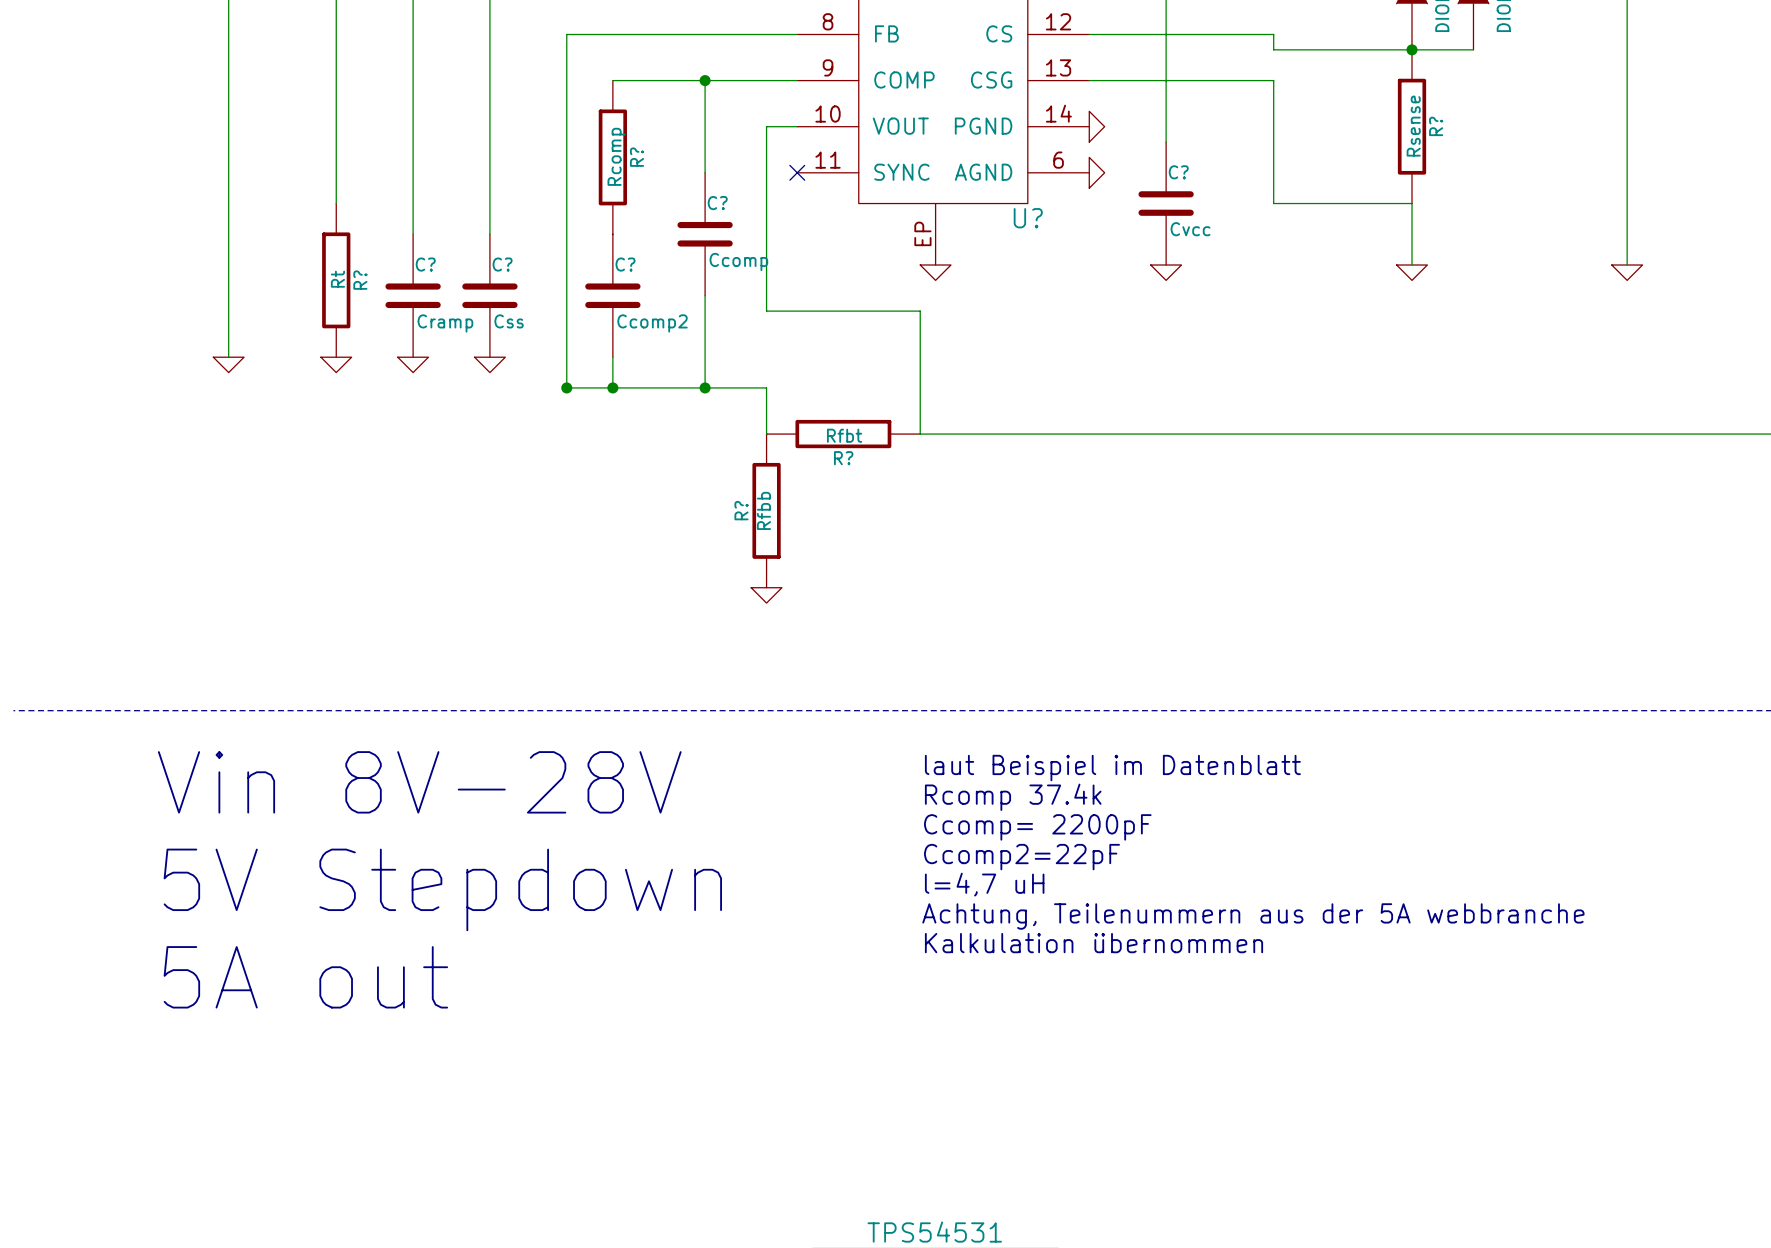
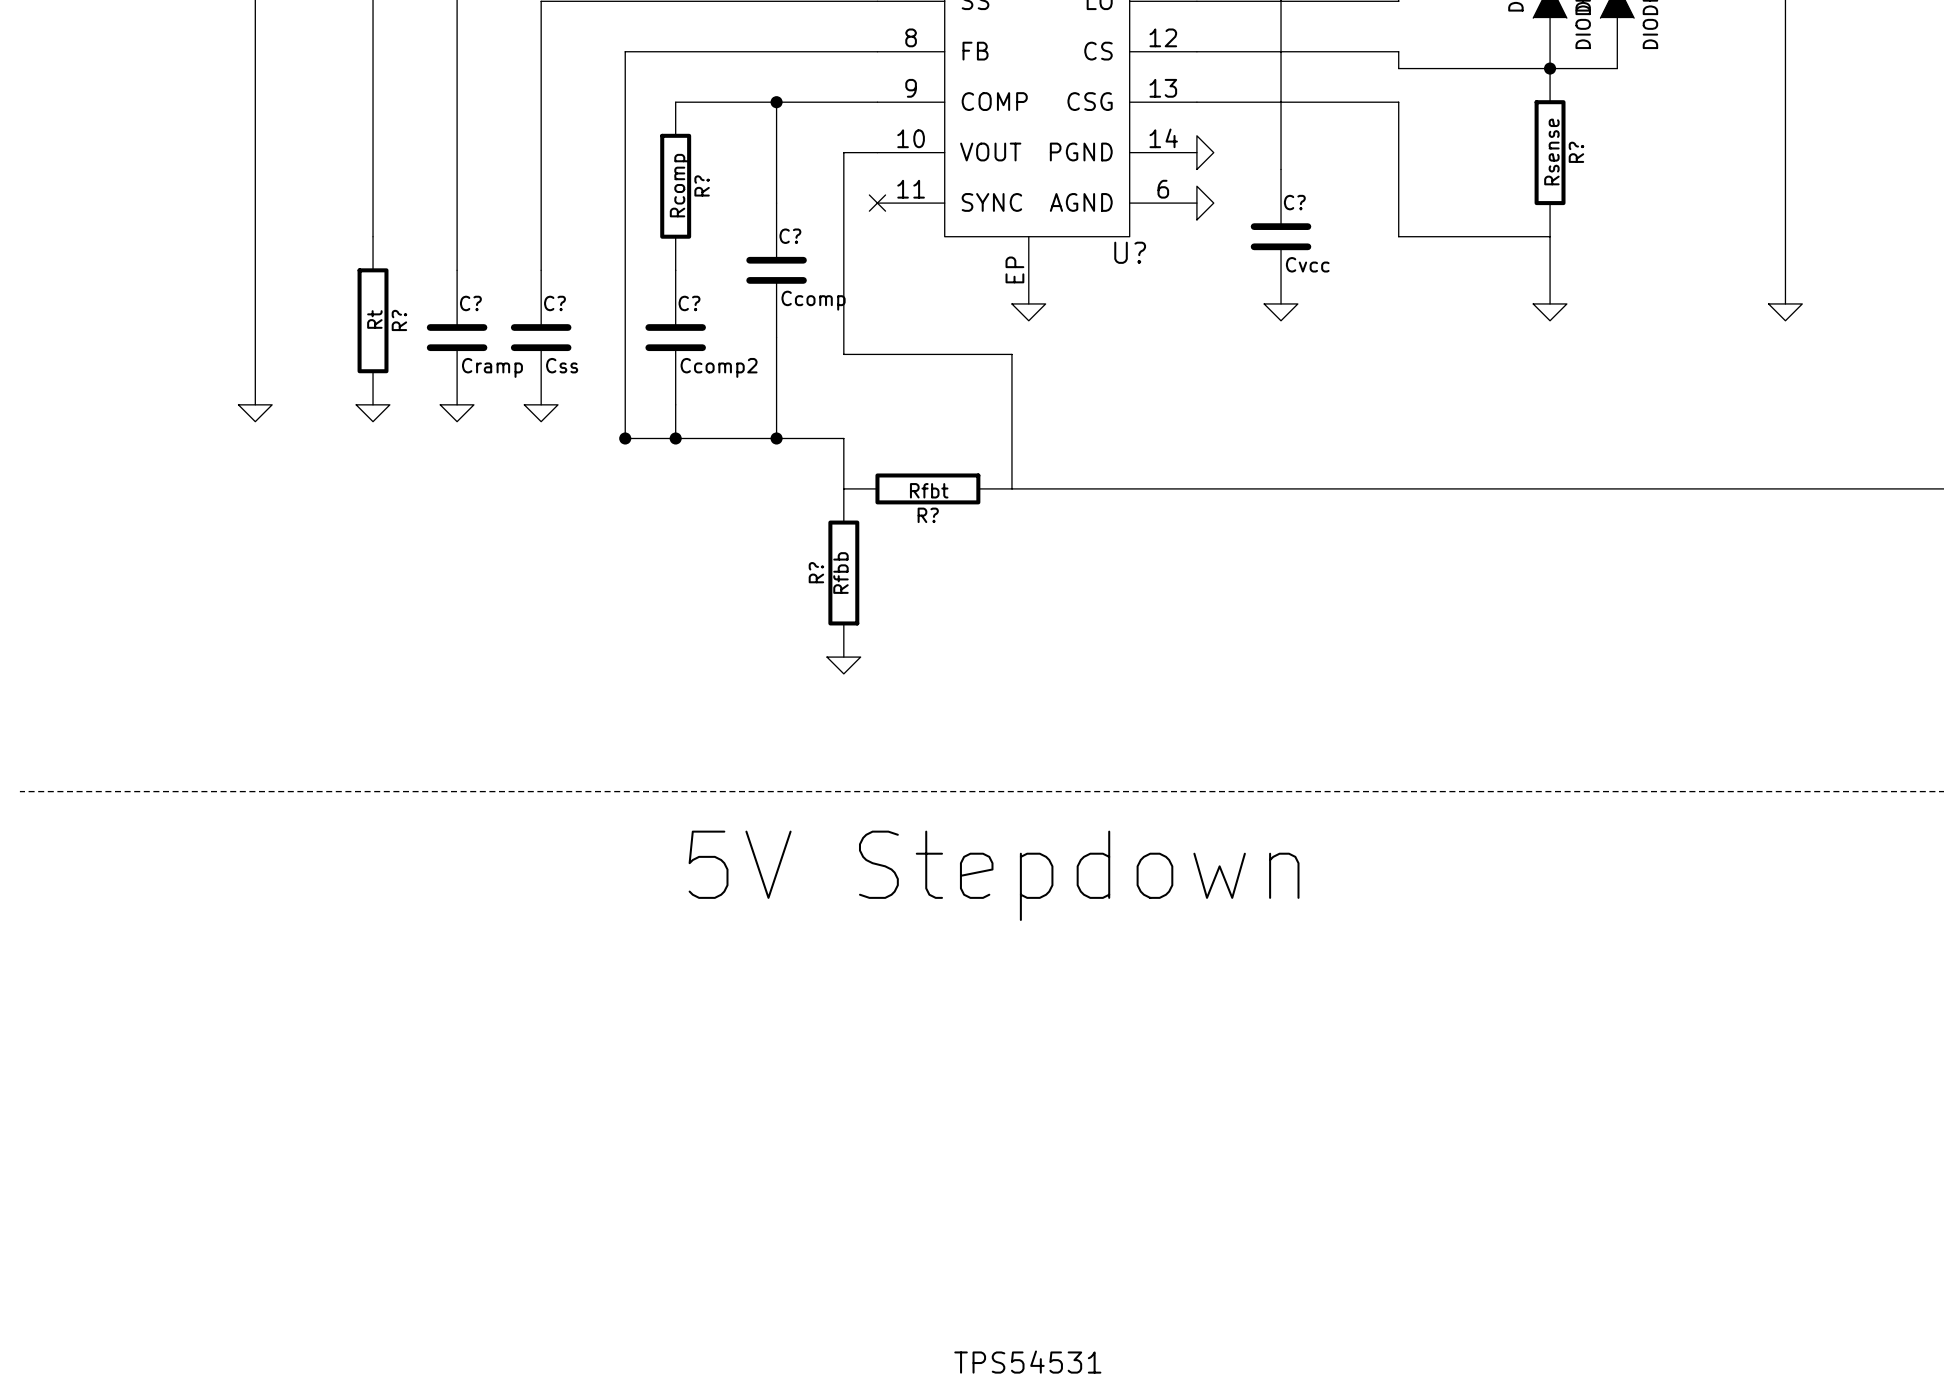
text: laut Beispiel im Datenblatt (1112, 768) -> none
text: Vin 8V-28V (419, 782) -> none
text: none -> 5V Stepdown (994, 875)
text: Rcomp 37.4k (1013, 797) -> none
text: Ccomp= 2200pF (1037, 827) -> none
text: Ccomp2=22pF (1021, 857) -> none
text: l=4,7 uH (984, 884) -> none
text: 5V Stepdown (442, 889) -> none
text: Achtung, Teilenummern aus der 5A webbranche (1253, 916) -> none
text: Kalkulation übernommen (1094, 943) -> none
text: 5A out (305, 977) -> none

